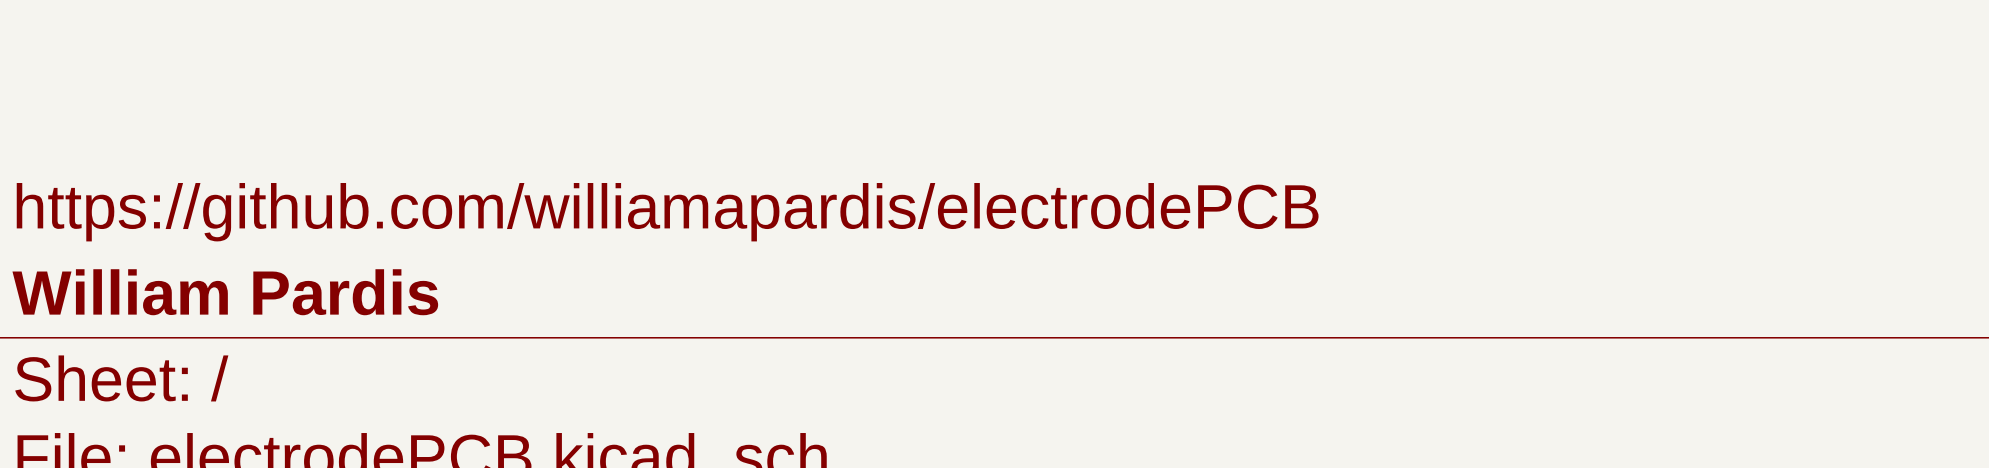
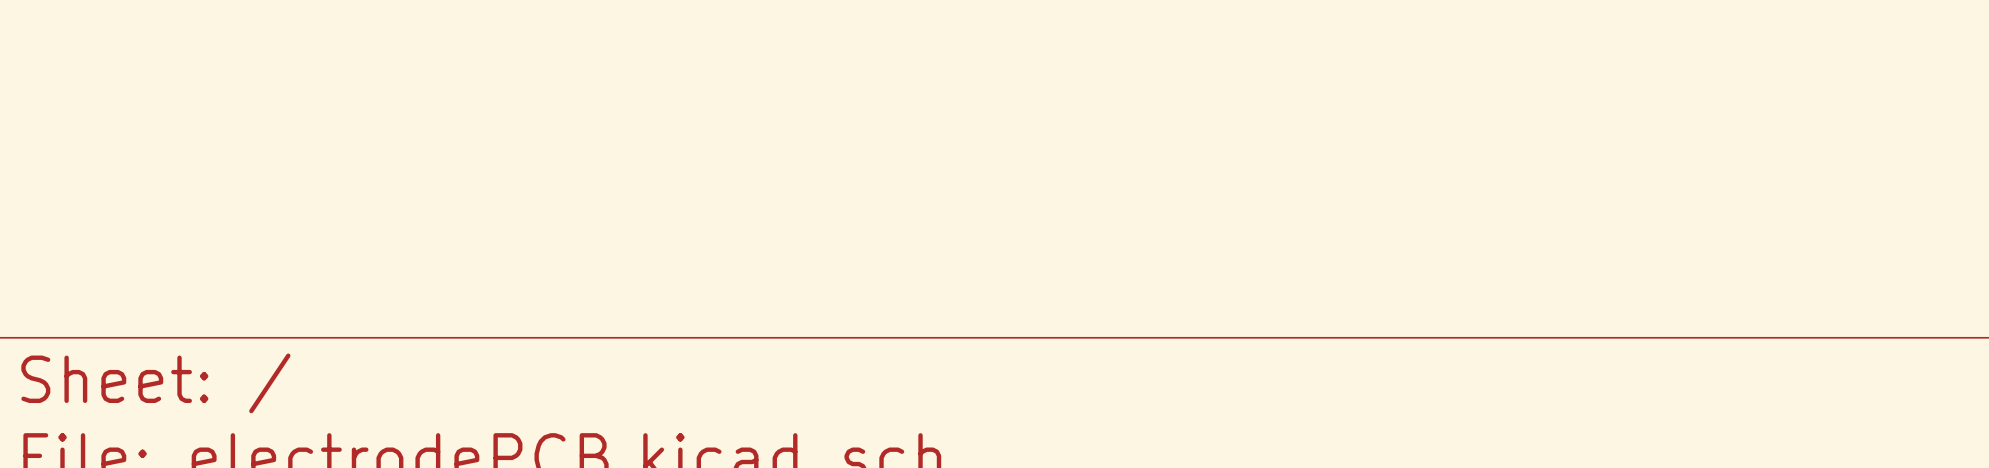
title block: https://github.com/williamapardis/electrodePCB (667, 212) -> none
title block: William Pardis (225, 292) -> none

